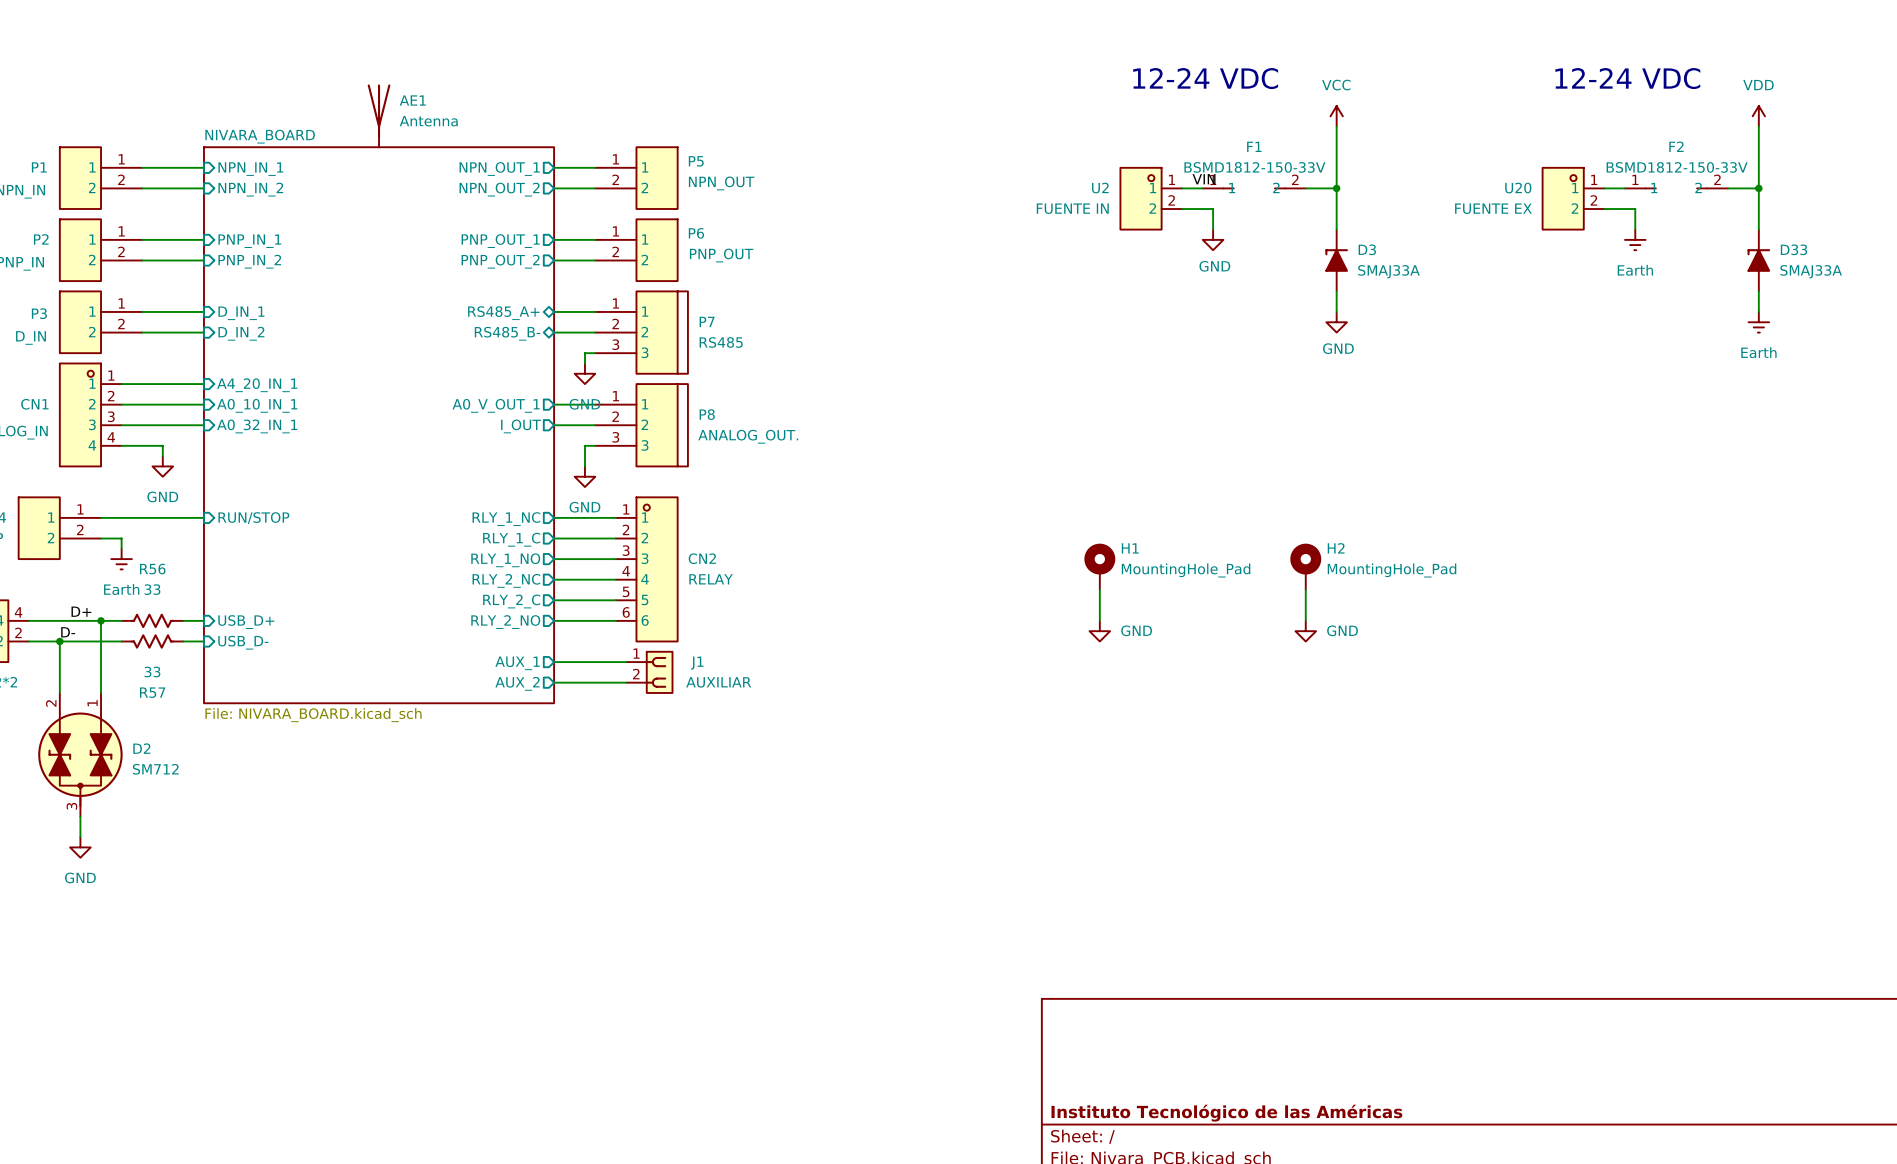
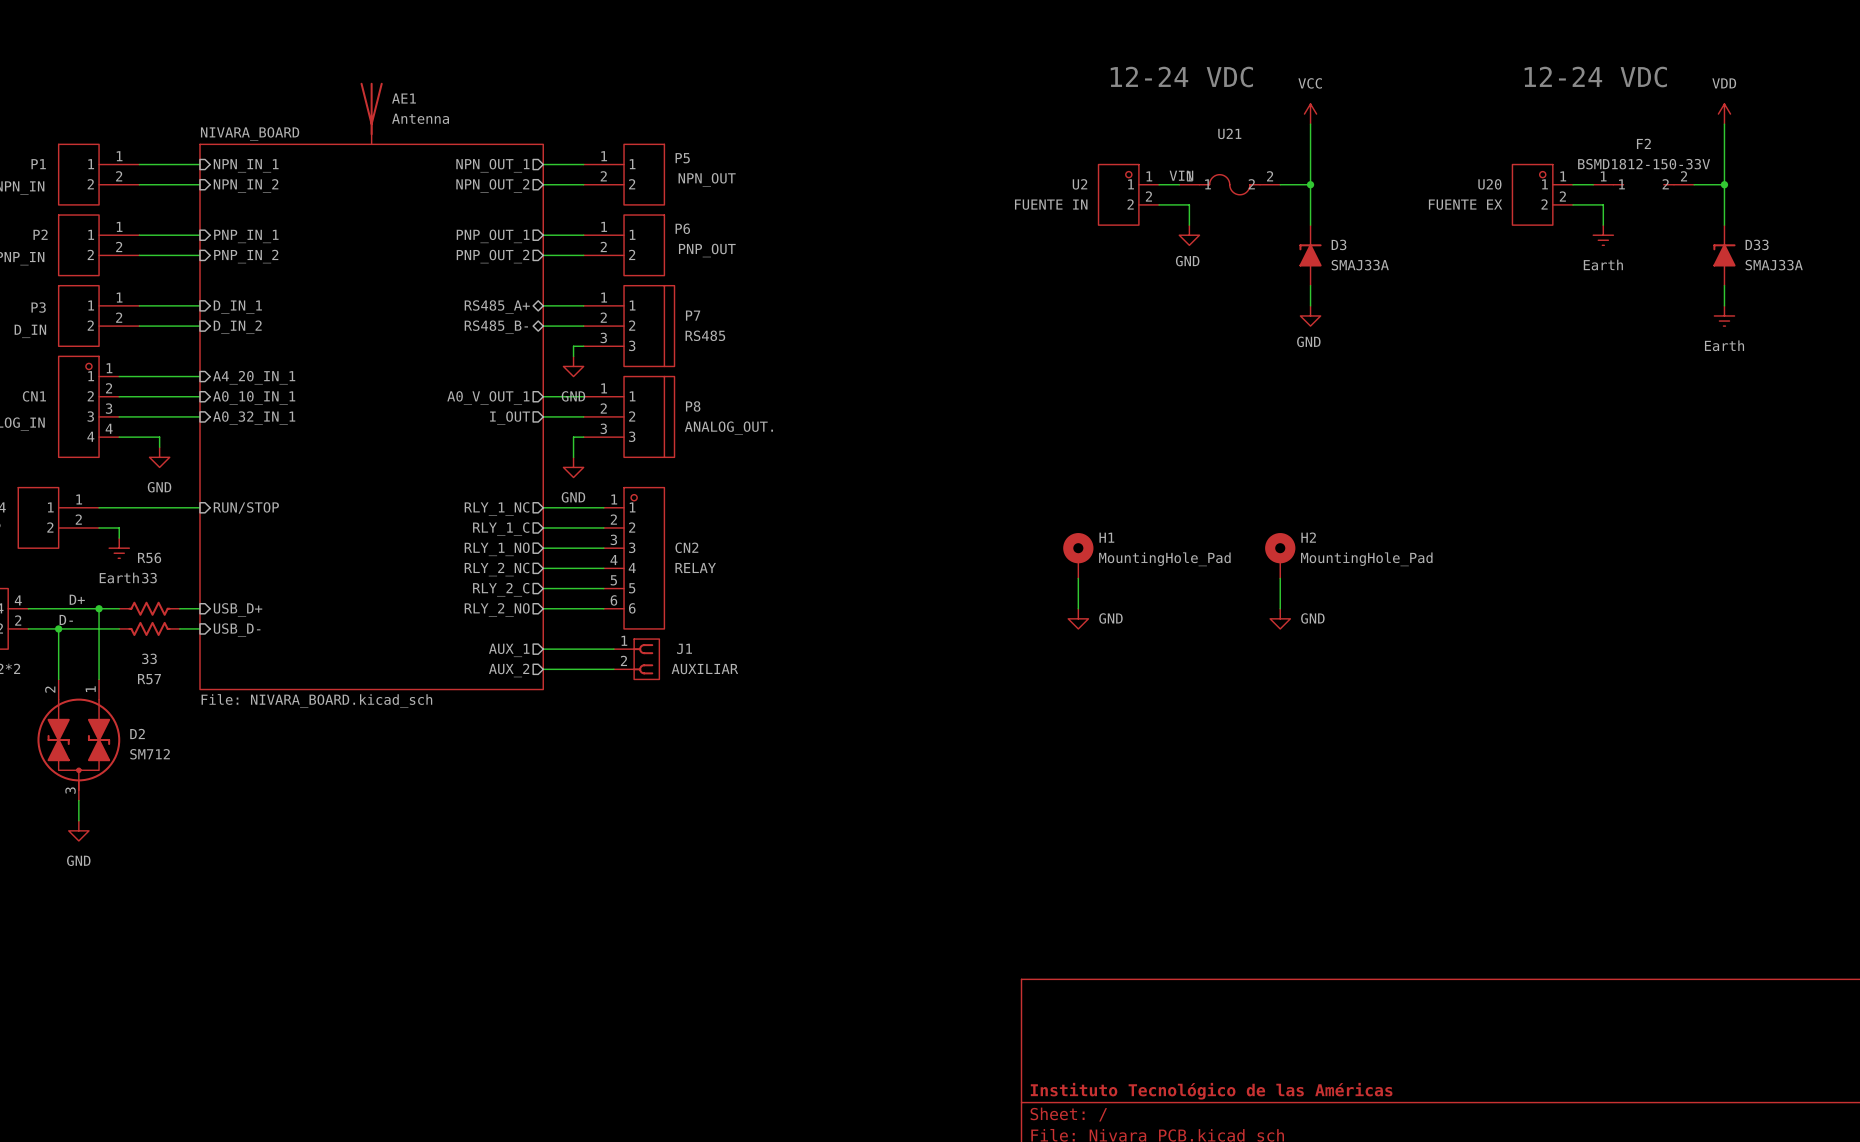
F1: BSMD1812-150-33V (1254, 188) -> none
U21: none -> (1229, 184)

